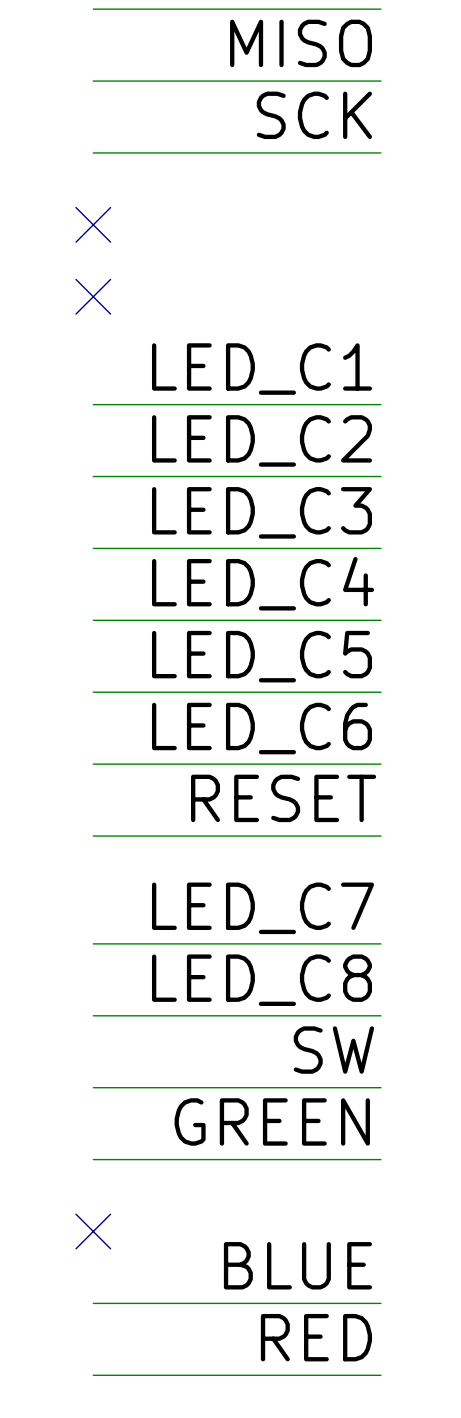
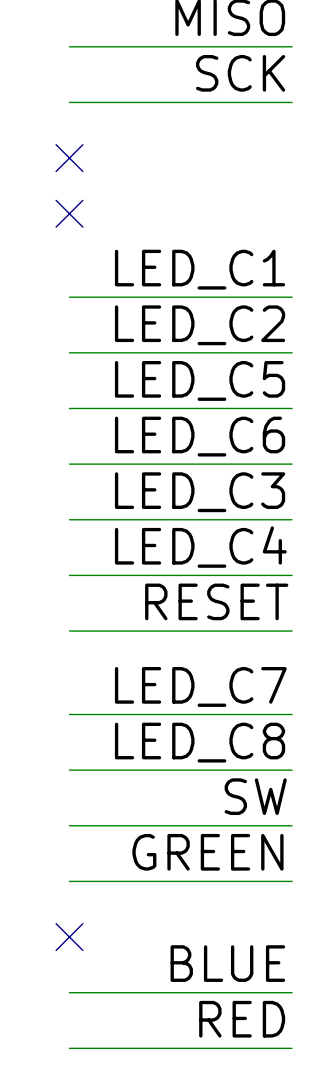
label: LED_C3 (262, 512) -> LED_C5 (200, 380)
label: LED_C4 (263, 583) -> LED_C6 (200, 436)
label: LED_C5 (262, 656) -> LED_C3 (200, 492)
label: LED_C6 (262, 728) -> LED_C4 (200, 547)

